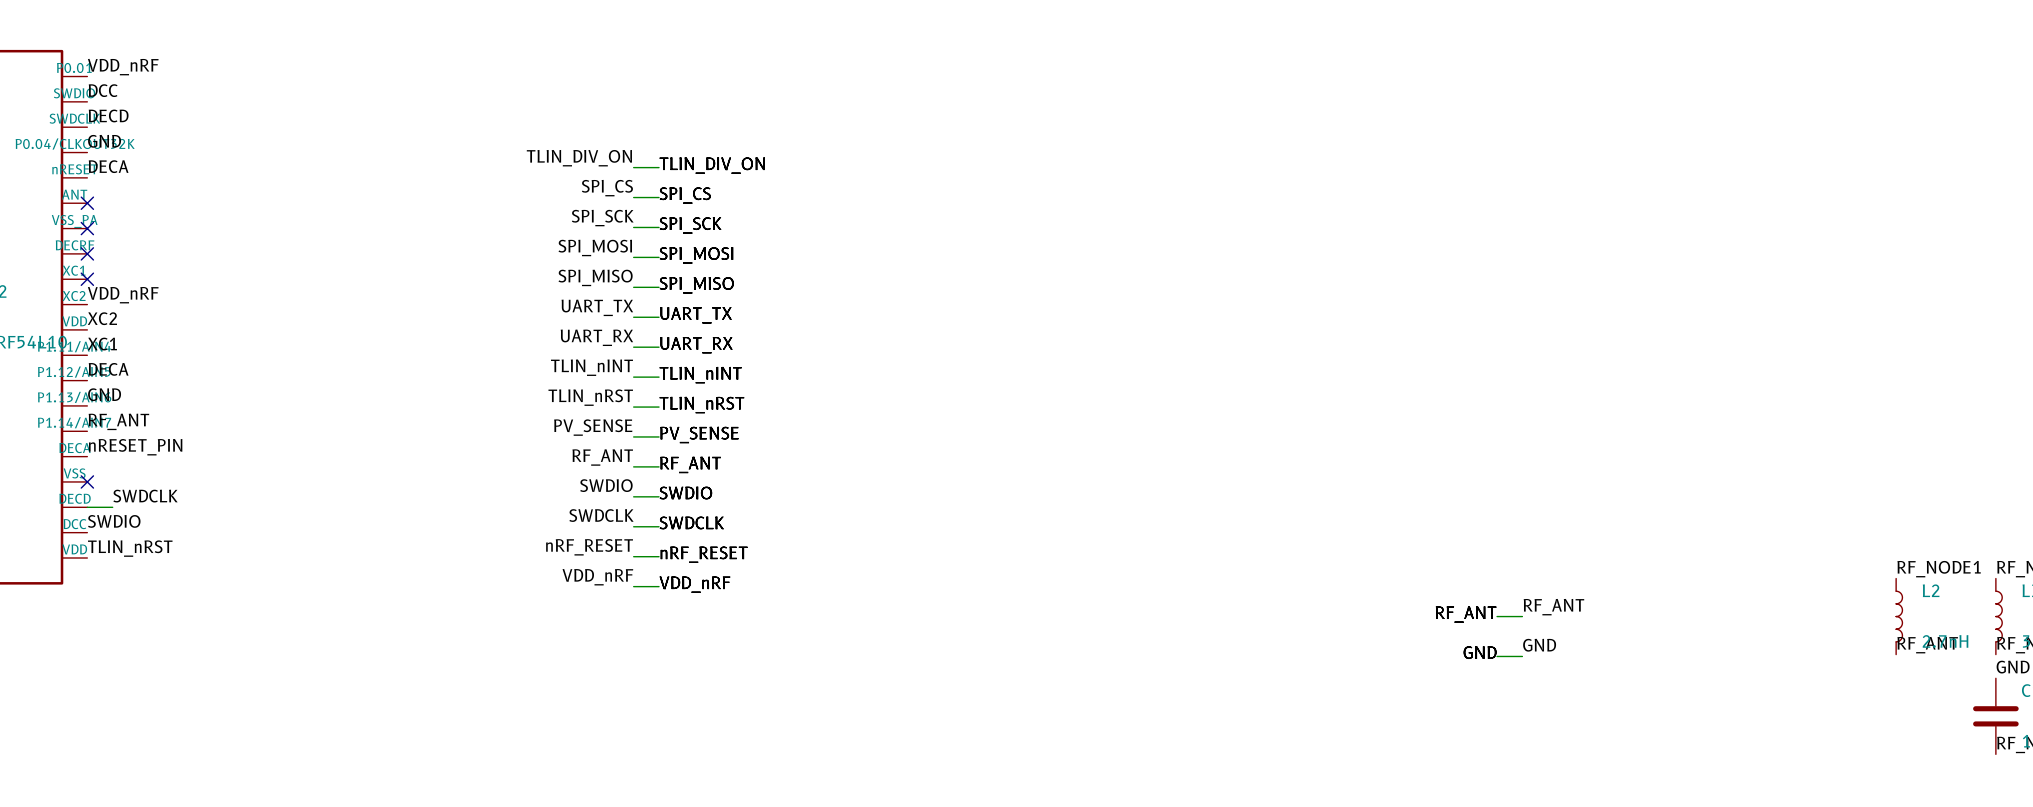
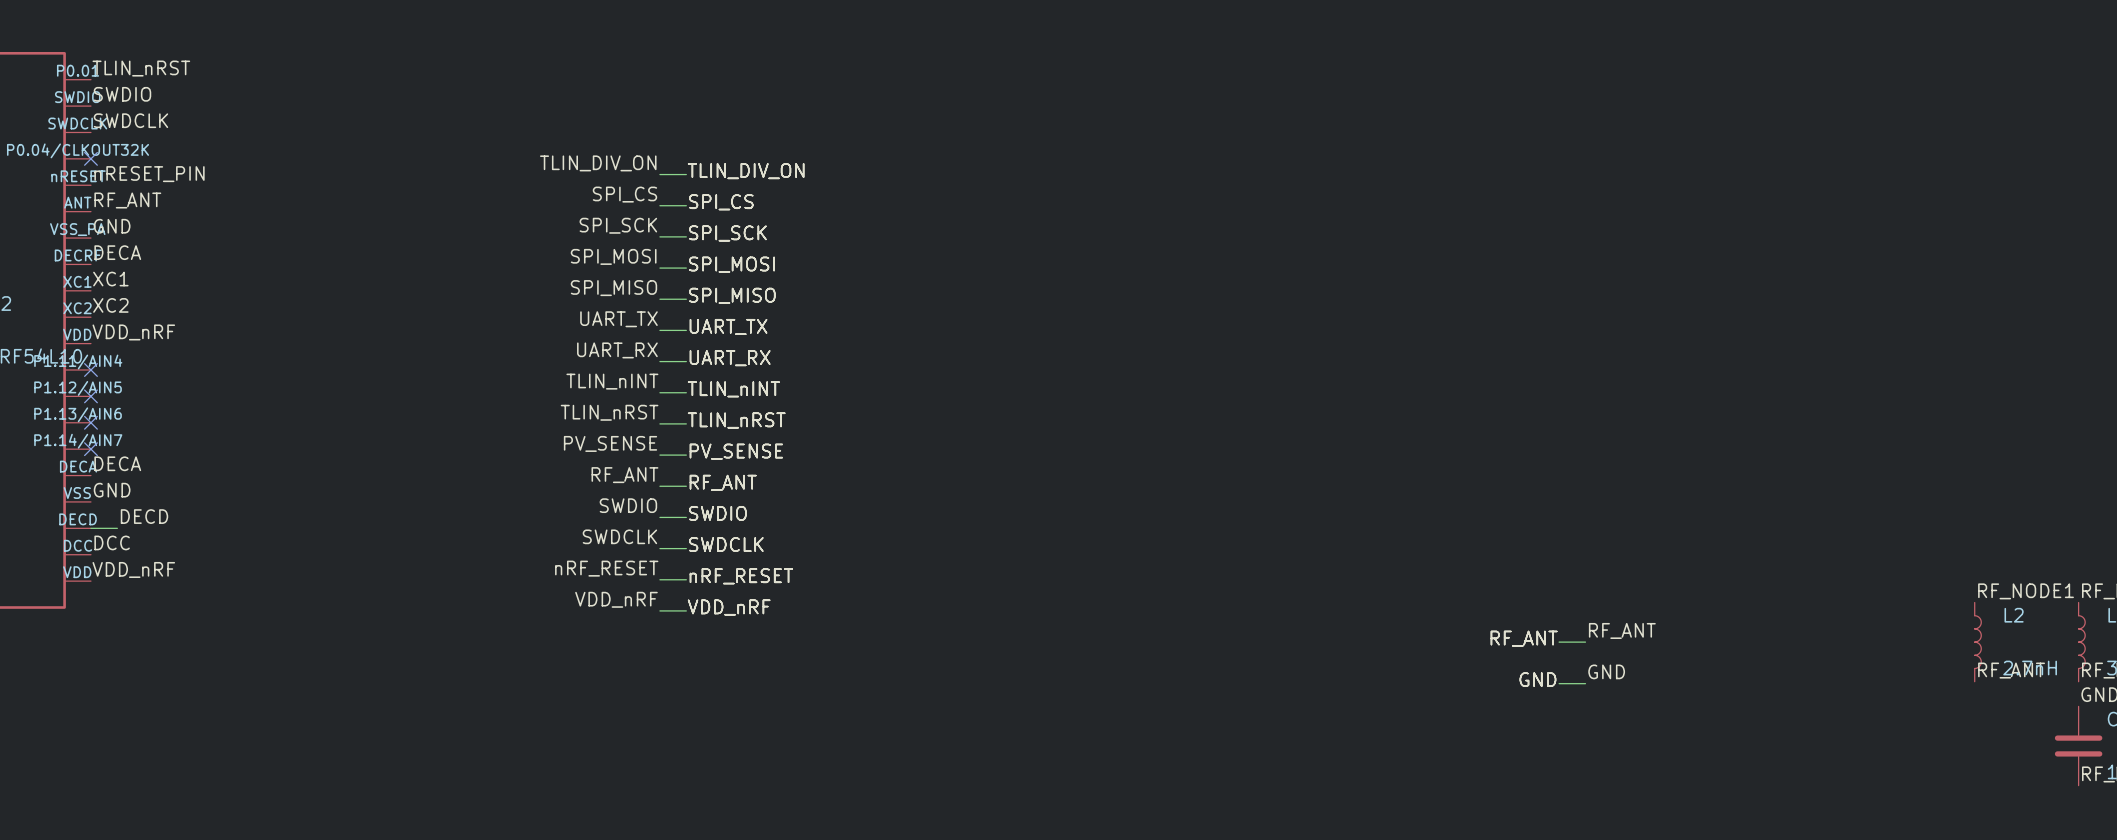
label: VDD_nRF (123, 67) -> TLIN_nRST (141, 68)
label: DCC (103, 90) -> SWDIO (122, 94)
label: DECD (108, 115) -> SWDCLK (130, 120)
label position: GND (104, 141) -> GND (112, 226)
no-connect mark: none -> (90, 158)
label: DECA (108, 166) -> nRESET_PIN (149, 174)
no-connect mark: (87, 203) -> none
no-connect mark: (87, 228) -> none
no-connect mark: (87, 253) -> none
no-connect mark: (87, 279) -> none
label: VDD_nRF (123, 295) -> XC2 (110, 305)
label: XC2 (102, 318) -> VDD_nRF (133, 332)
label position: XC1 (102, 344) -> XC1 (110, 279)
no-connect mark: none -> (90, 369)
label position: DECA (108, 369) -> DECA (117, 252)
no-connect mark: none -> (90, 396)
label position: GND (104, 394) -> GND (112, 490)
no-connect mark: none -> (90, 422)
label position: RF_ANT (118, 421) -> RF_ANT (127, 200)
no-connect mark: none -> (90, 449)
label: nRESET_PIN (135, 447) -> DECA (117, 463)
no-connect mark: (87, 481) -> none
label: SWDCLK (145, 496) -> DECD (144, 516)
label: SWDIO (114, 521) -> DCC (112, 542)
label: TLIN_nRST (130, 548) -> VDD_nRF (133, 569)

